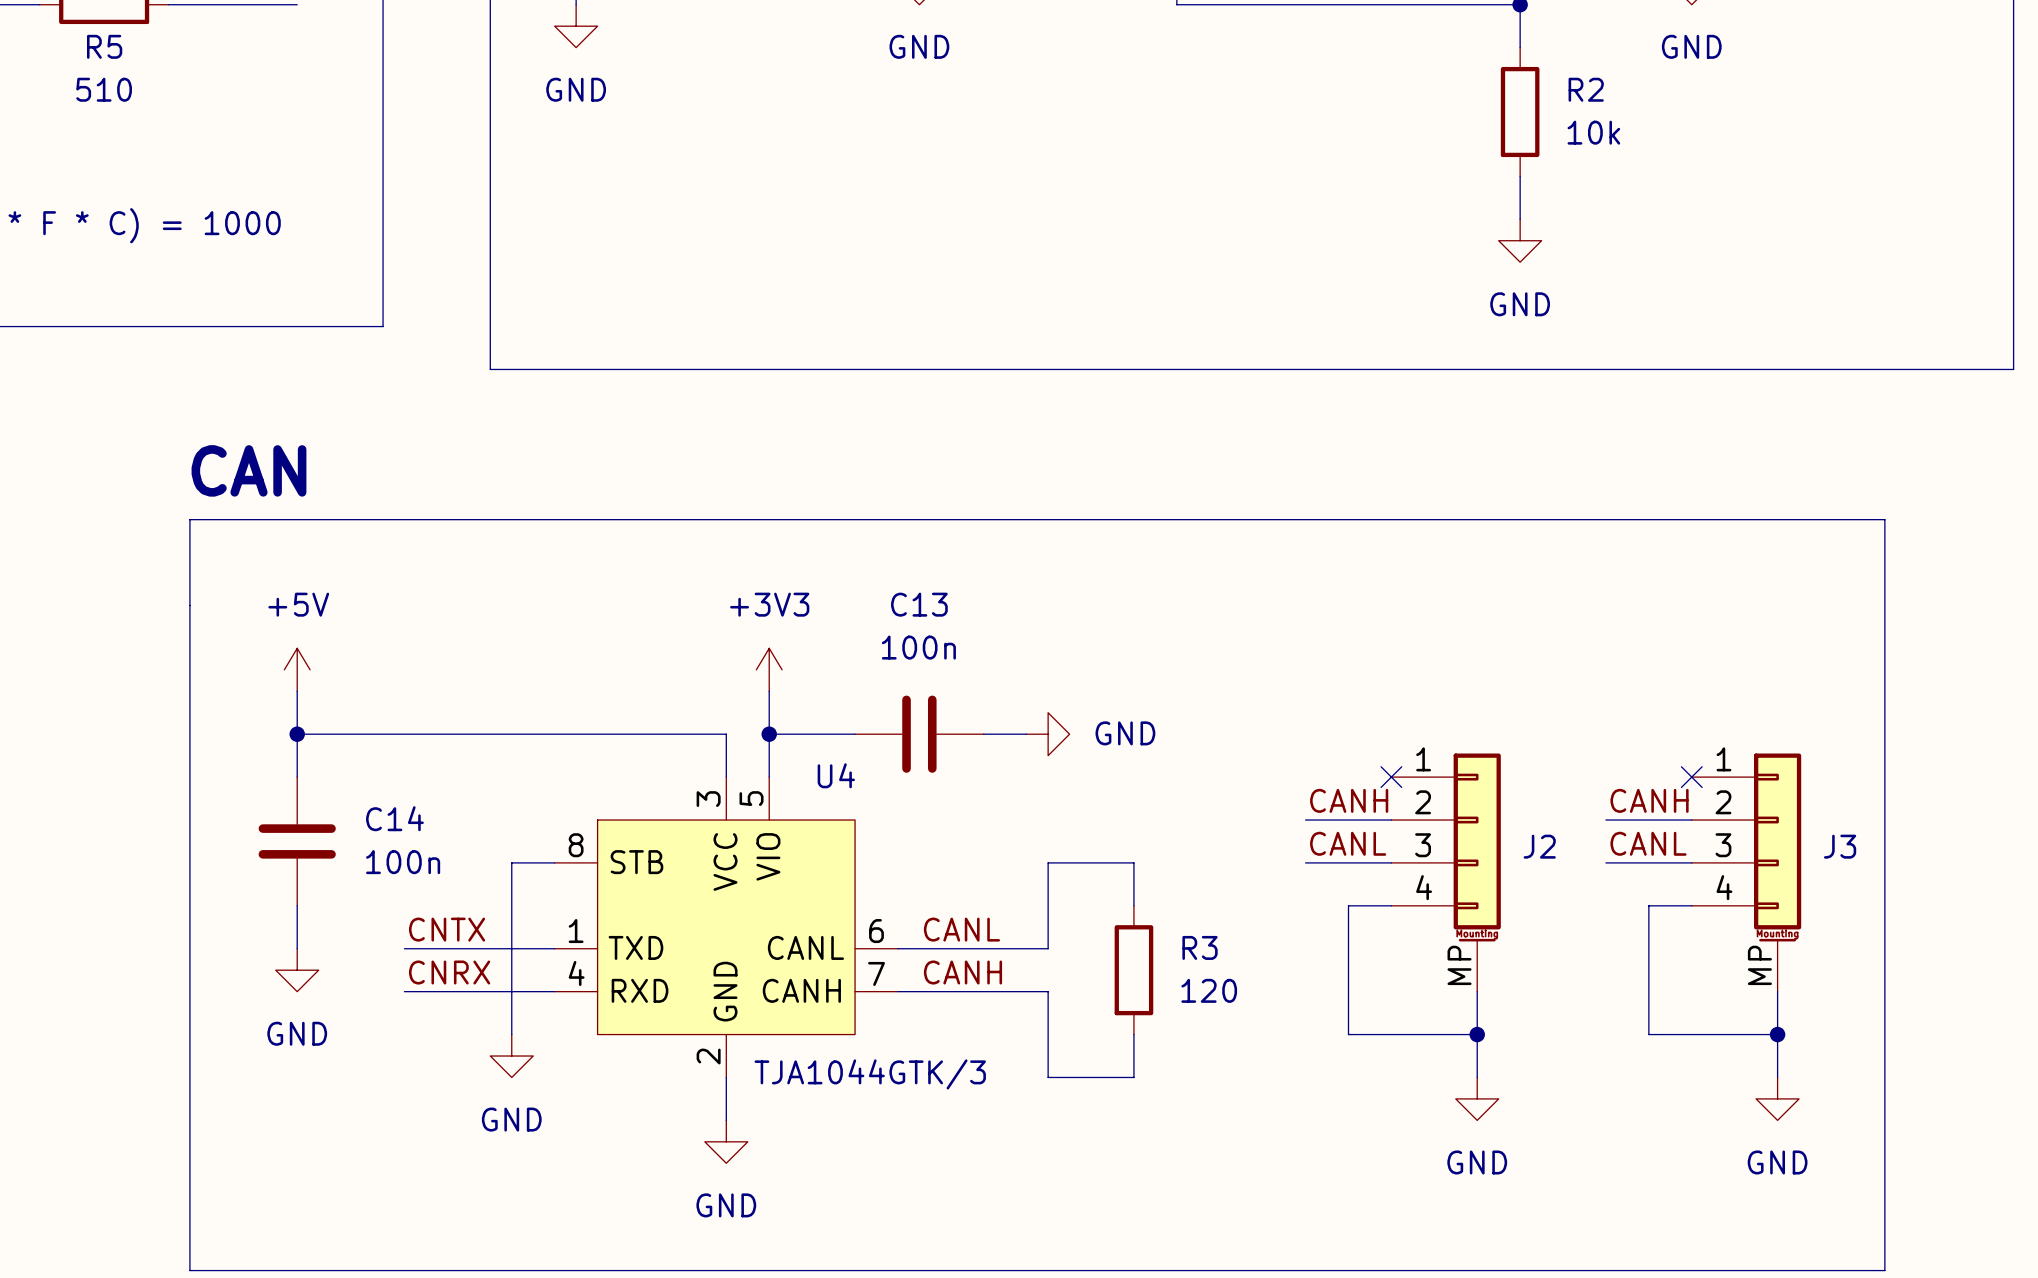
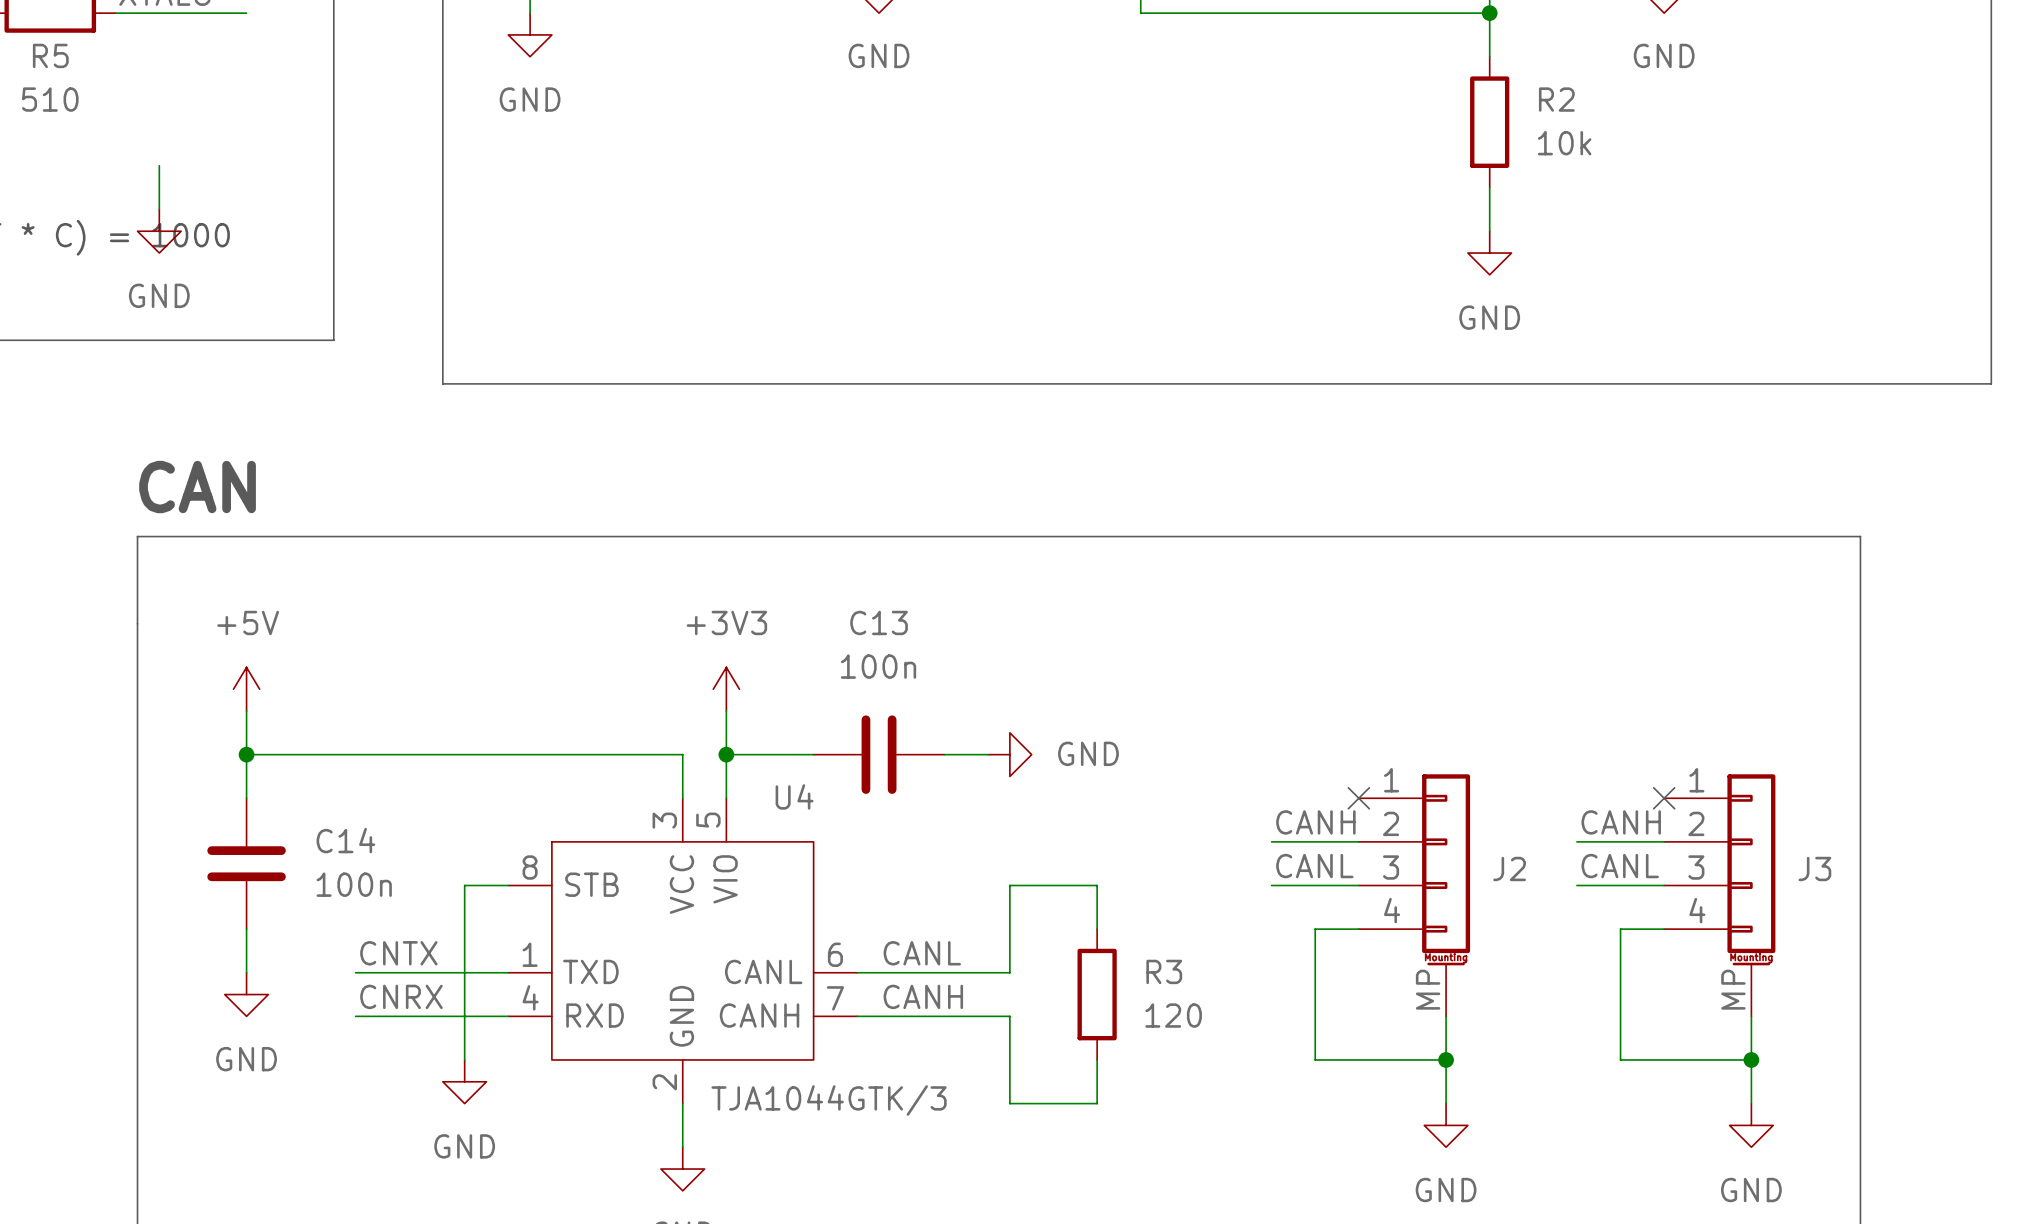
wire: none -> (159, 165) (159, 209)
power symbol: none -> GND (159, 231)

